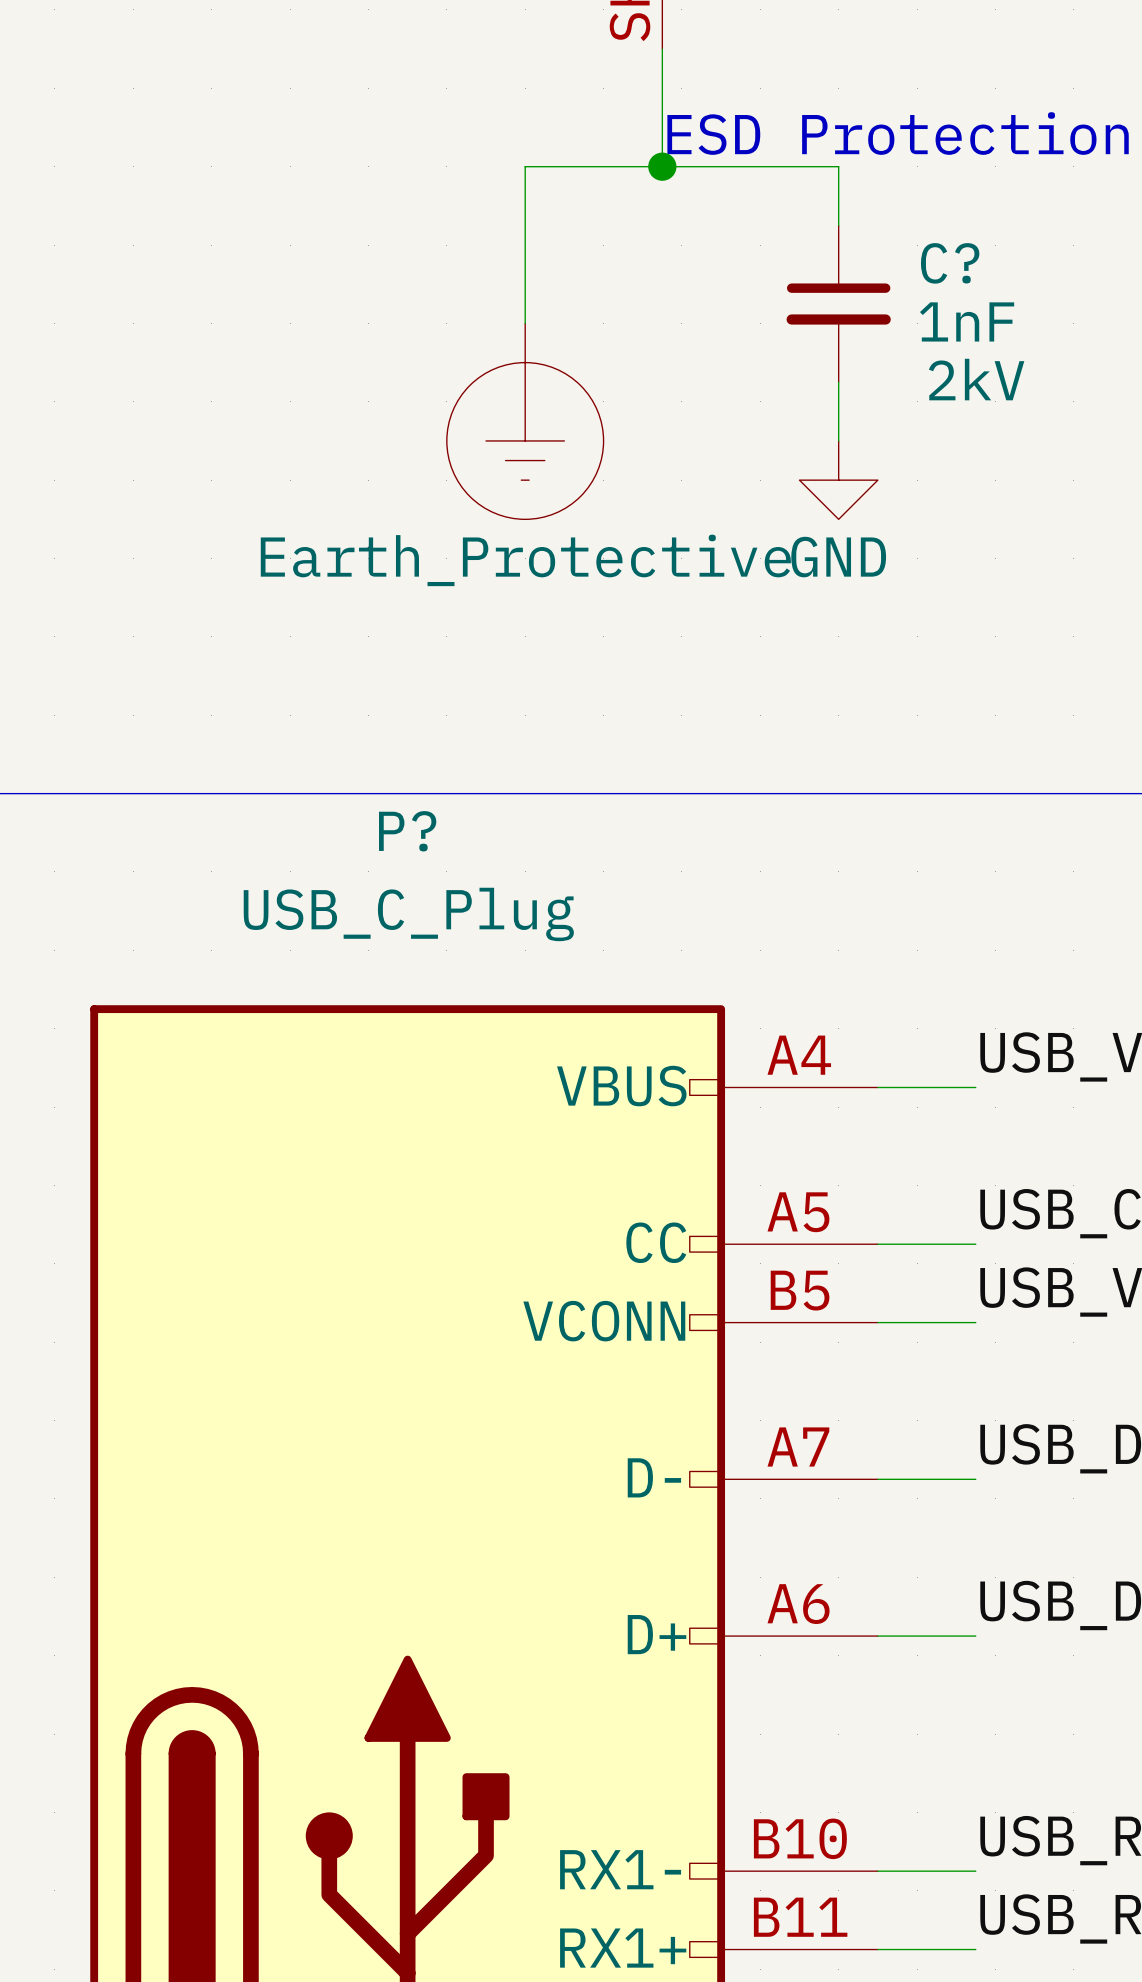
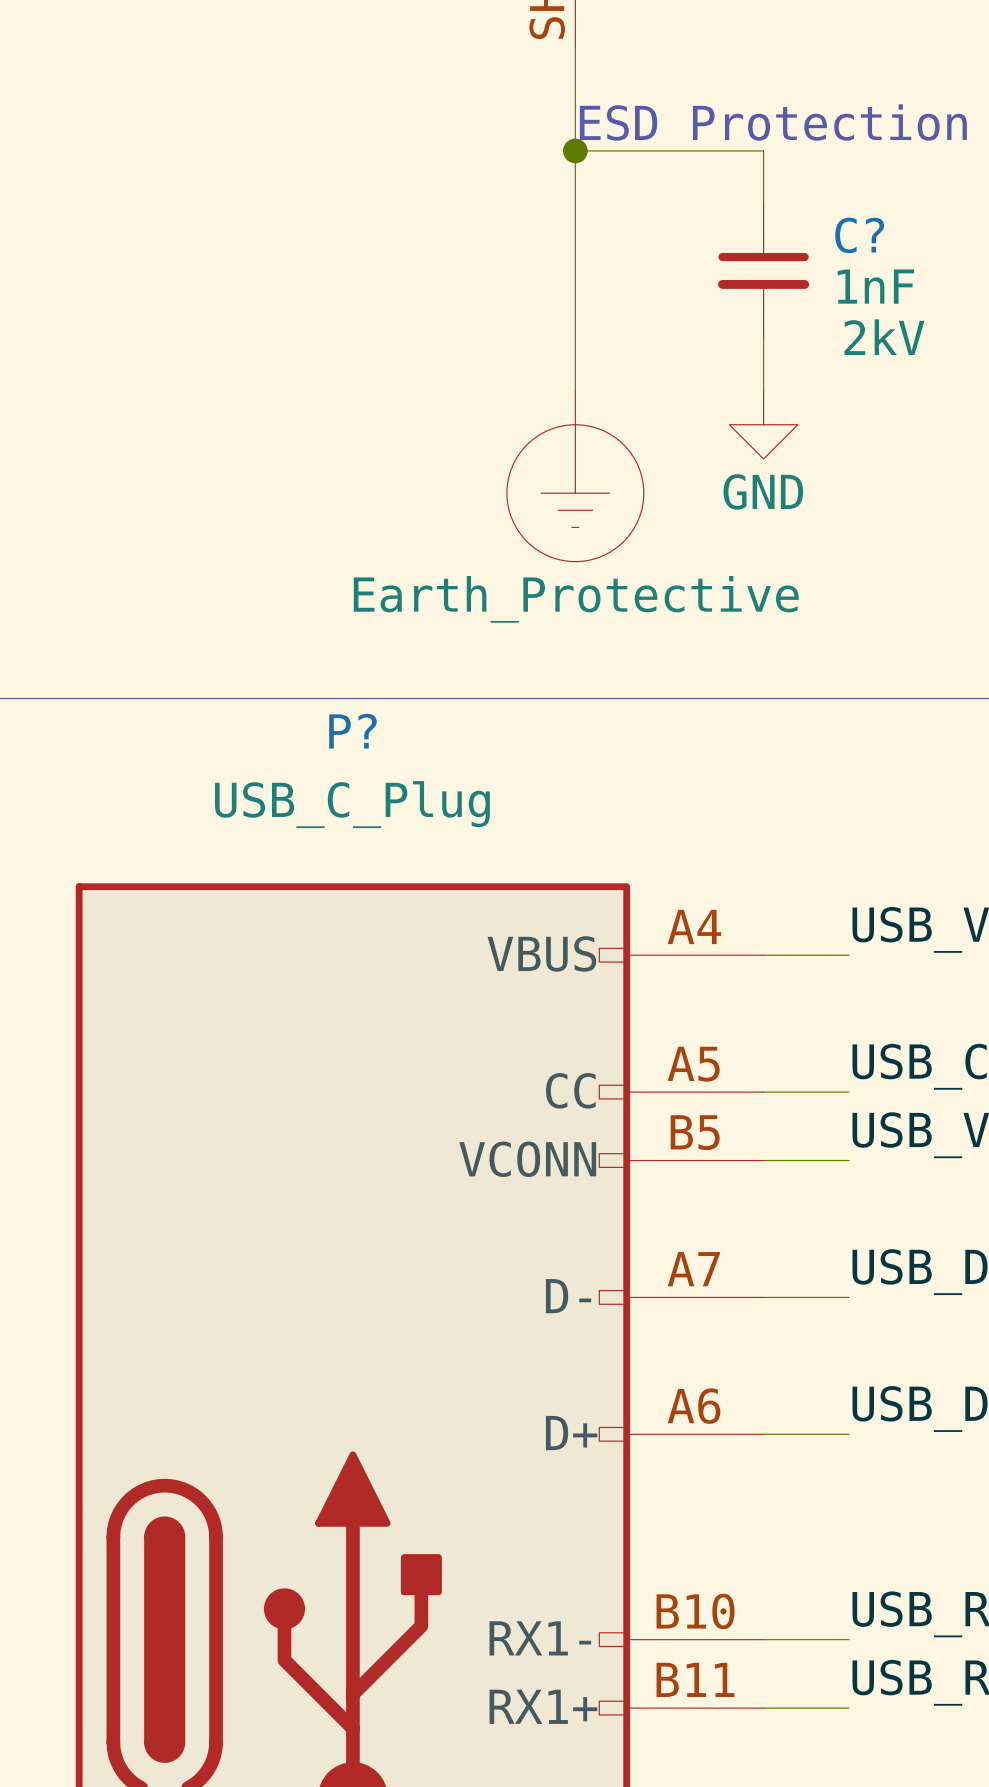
wire: (662, 166) (525, 166) (525, 323) -> (575, 150) (575, 390)
wire: (838, 166) (838, 225) -> (729, 150) (763, 150) (763, 202)
C? position: (838, 303) -> (763, 270)
wire: (838, 382) (838, 440) -> (763, 339) (763, 390)
power symbol position: Earth_Protective (525, 421) -> Earth_Protective (575, 476)
power symbol position: GND (838, 480) -> GND (763, 424)

